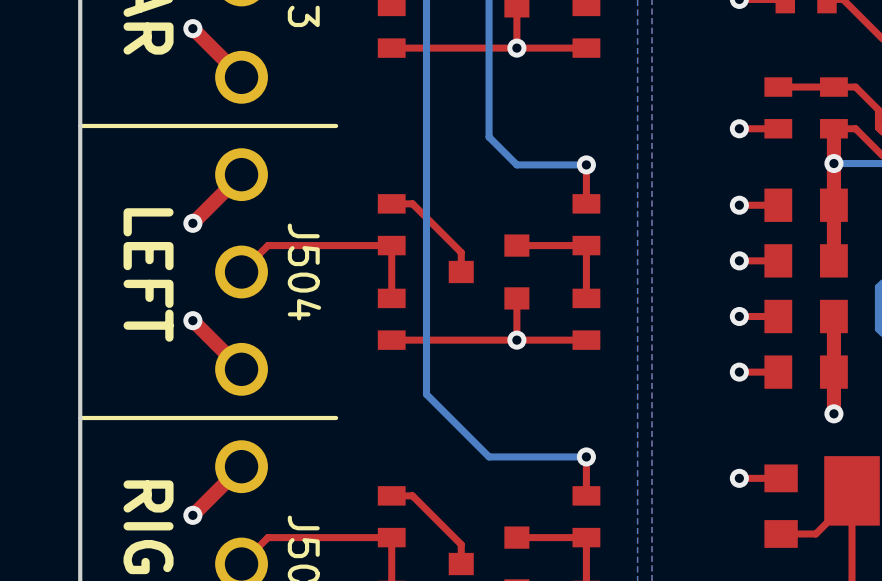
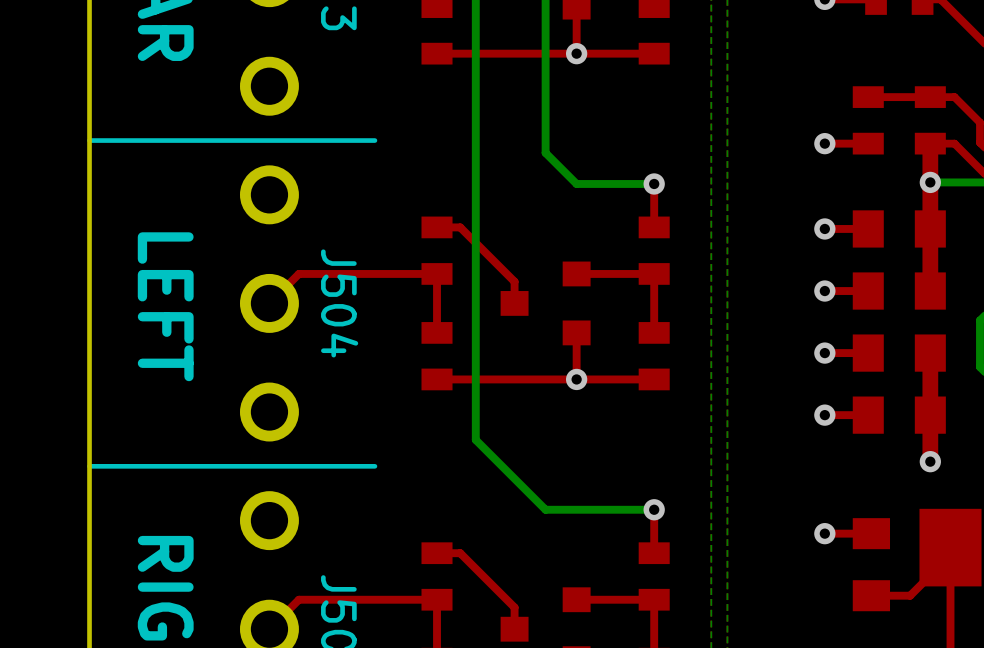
top track: (192, 28) (241, 77) -> none
via: (192, 28) -> none
top track: (241, 174) (192, 223) -> none
via: (192, 223) -> none
top track: (192, 320) (241, 369) -> none
via: (192, 320) -> none
top track: (241, 466) (192, 515) -> none
via: (192, 515) -> none

